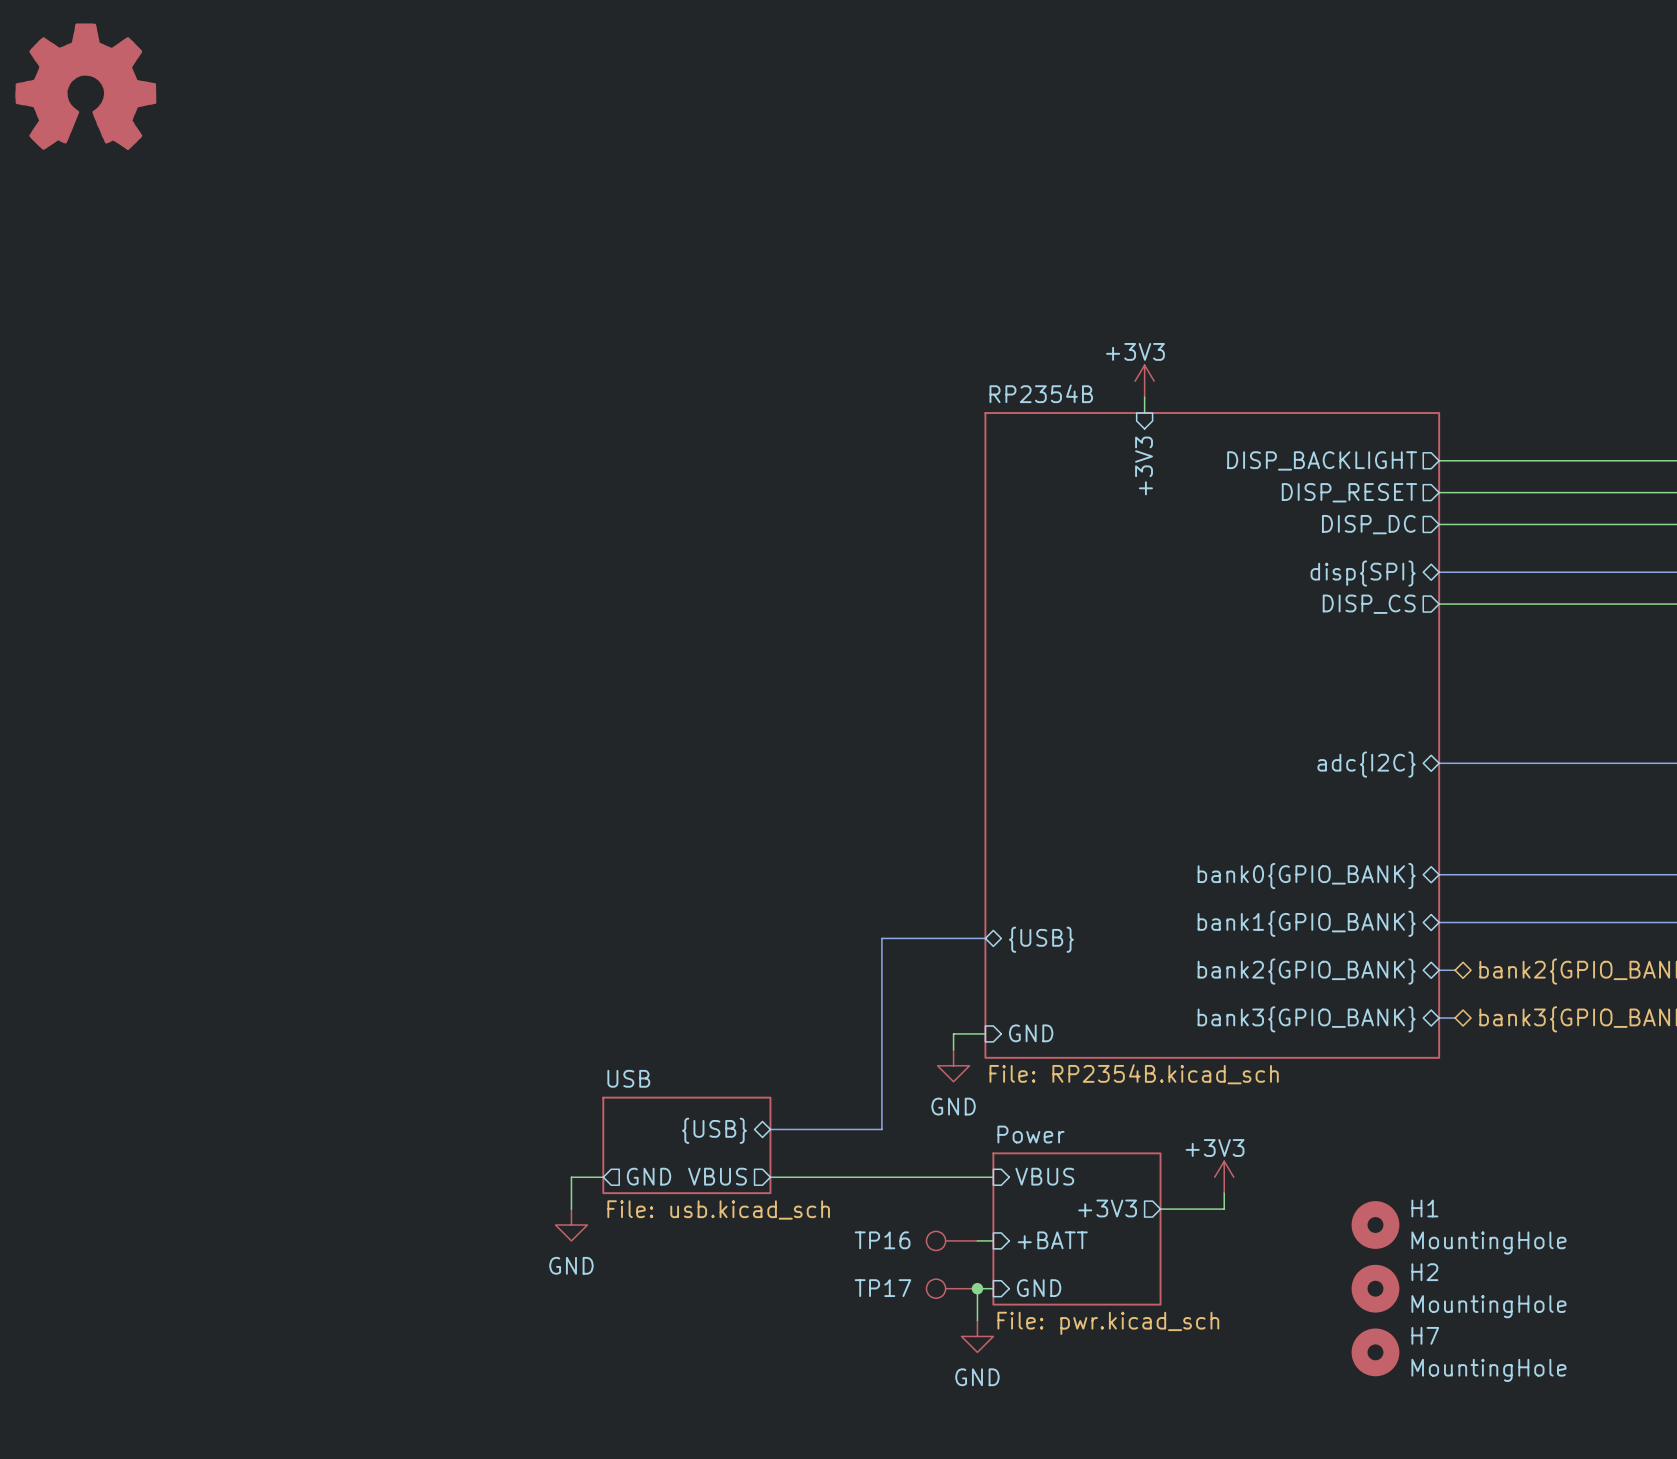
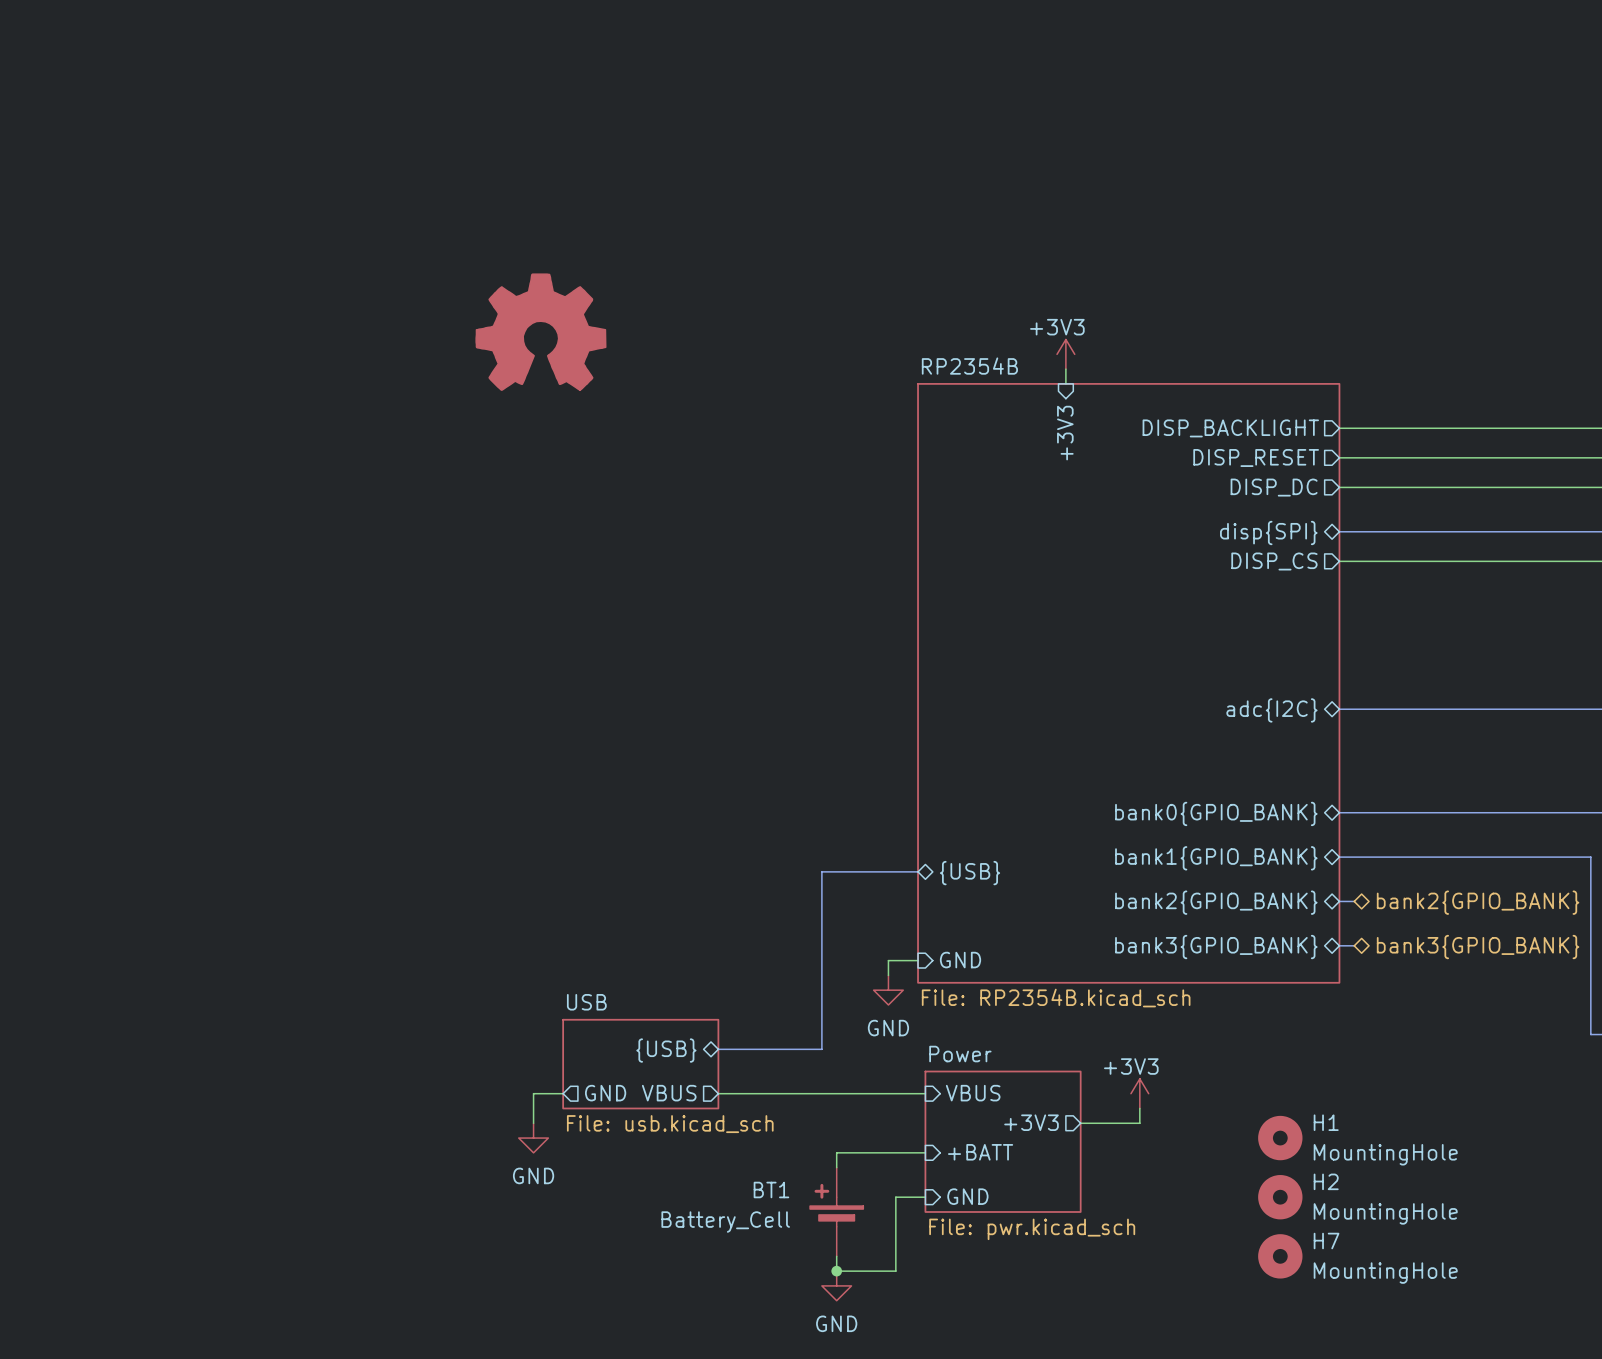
part: (85, 86) -> none
part: none -> (540, 332)
TP16: (951, 1240) -> none
wire: none -> (910, 1152) (836, 1152) (836, 1167)
TP17: (951, 1288) -> none
wire: (977, 1288) (977, 1320) -> (910, 1197) (895, 1197) (895, 1271) (836, 1271) (836, 1256)
junction: (977, 1288) -> none
BT1: none -> Battery_Cell (836, 1211)
power symbol position: GND (977, 1336) -> GND (836, 1285)
junction: none -> (836, 1271)

